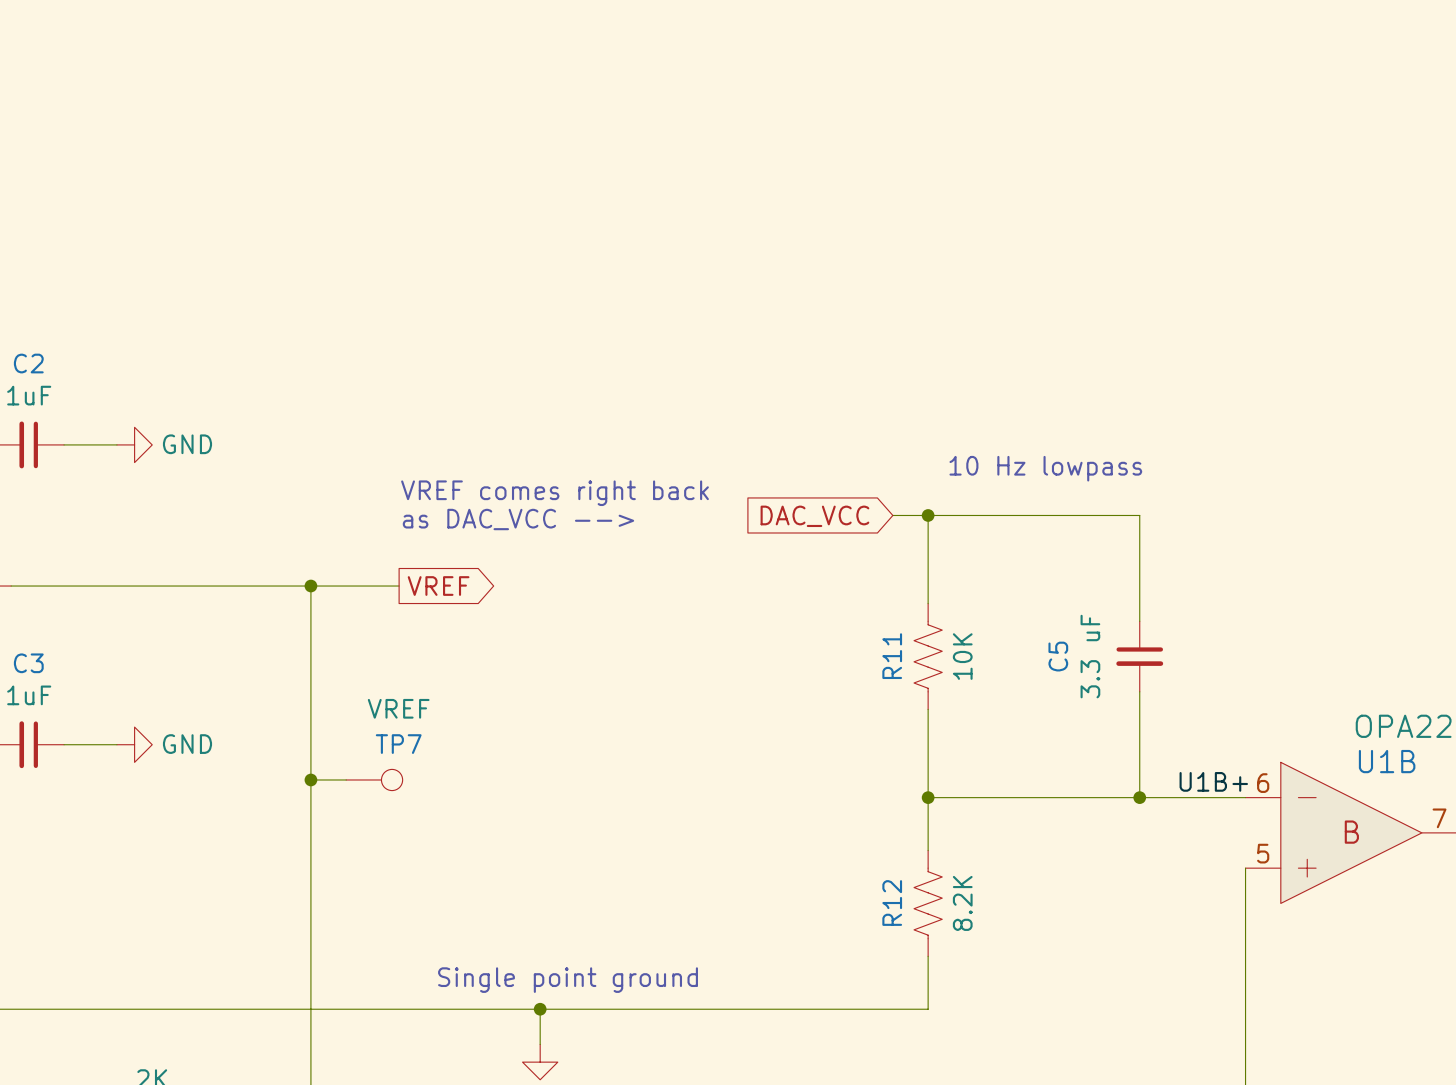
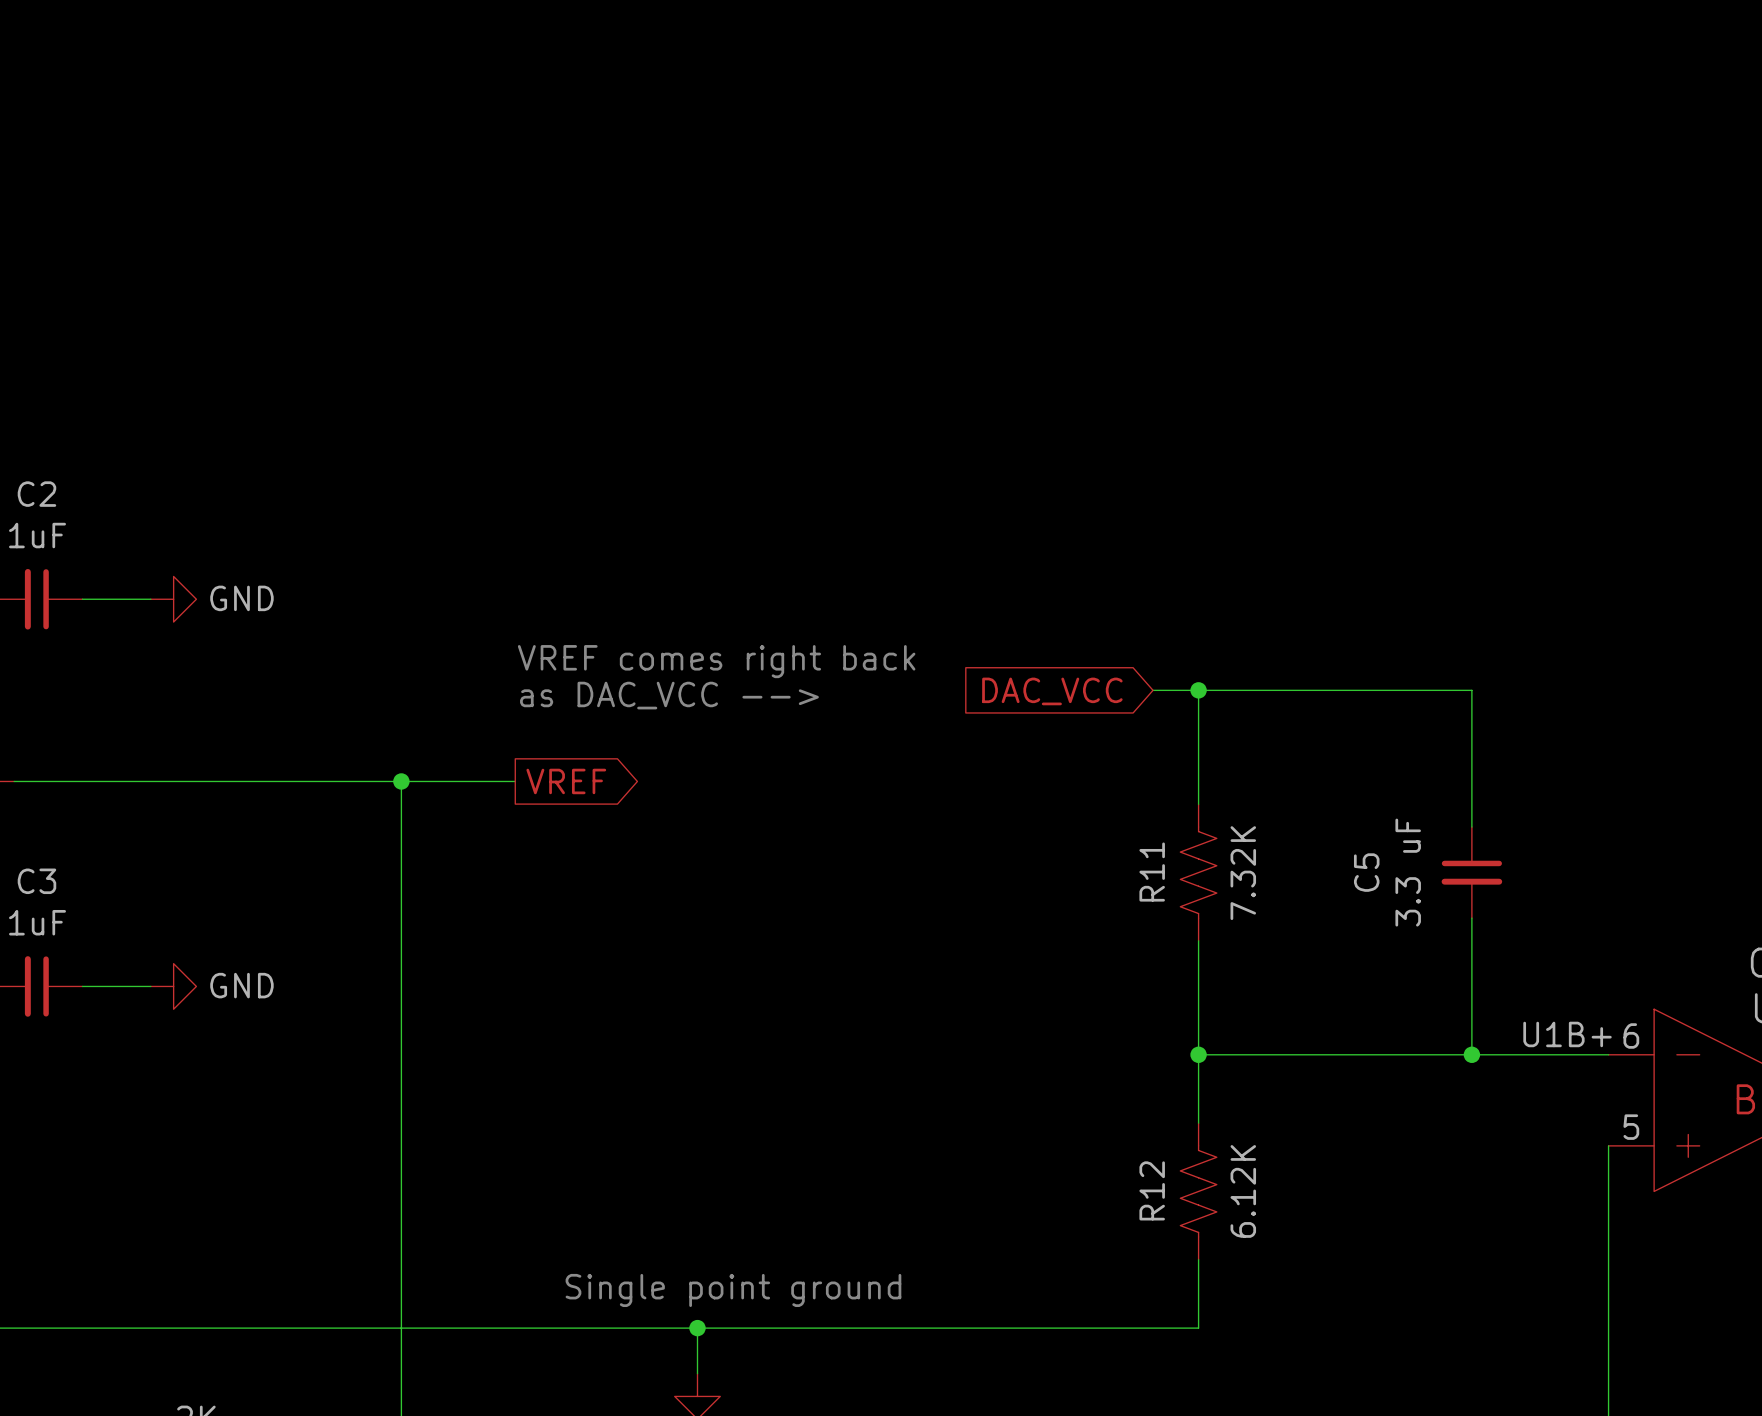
text: 10 Hz lowpass (1045, 468) -> none
R11 value: 10K (962, 656) -> 7.32K (1243, 873)
wire: (310, 779) (346, 779) -> none
junction: (310, 779) -> none
TP7: VREF (374, 779) -> none
R12 value: 8.2K (962, 903) -> 6.12K (1243, 1191)

